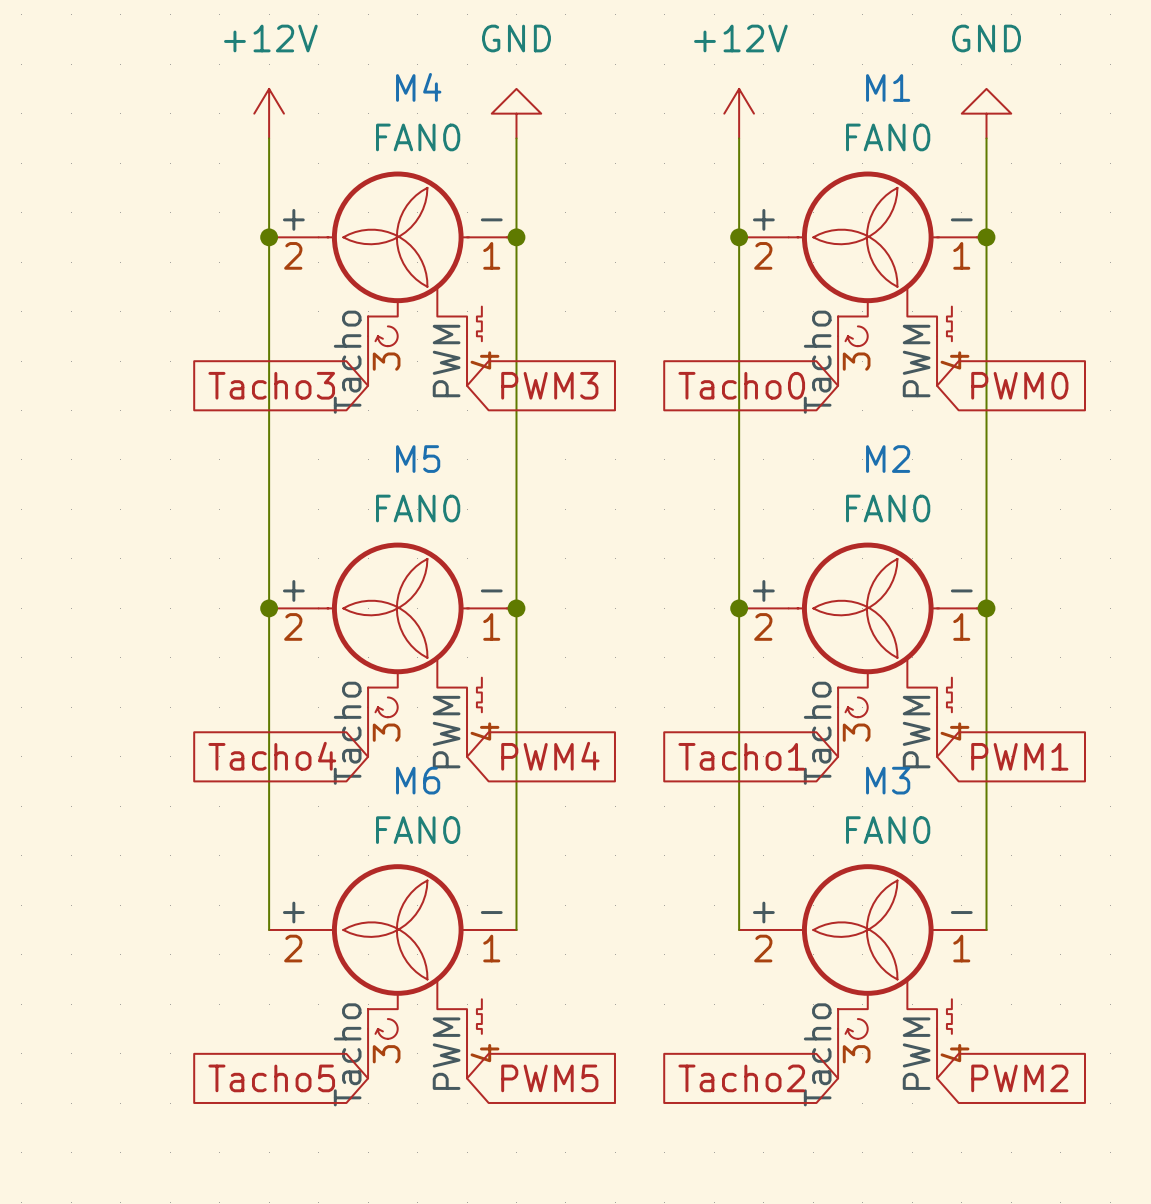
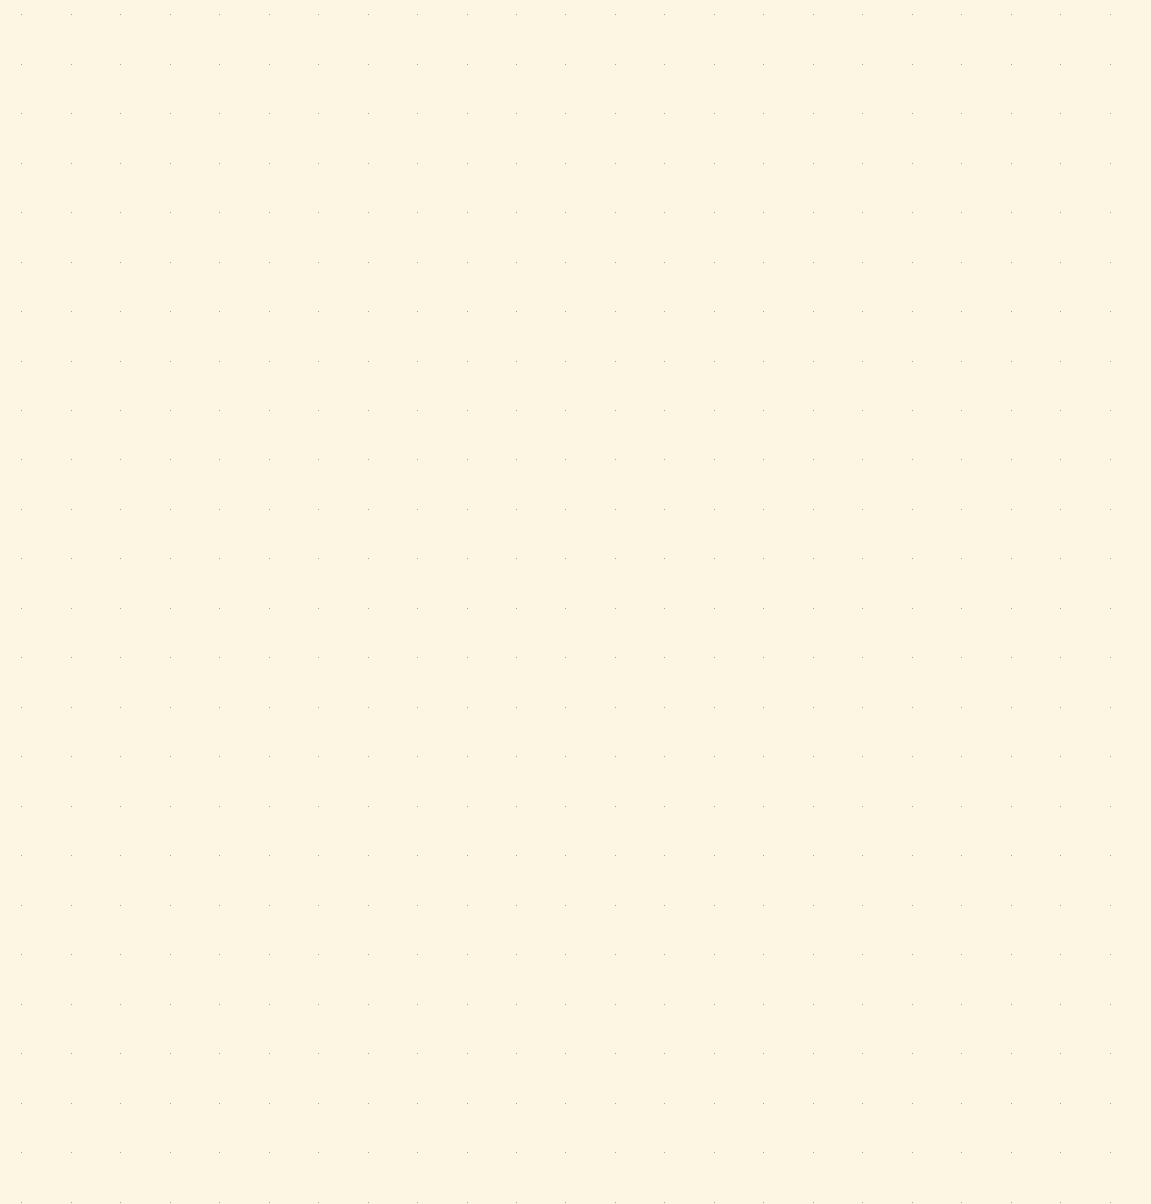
power symbol: +12V (269, 113) -> none
power symbol: GND (516, 113) -> none
power symbol: +12V (739, 113) -> none
power symbol: GND (986, 113) -> none
wire: (269, 138) (269, 929) -> none
wire: (516, 138) (516, 929) -> none
wire: (739, 138) (739, 929) -> none
wire: (986, 138) (986, 929) -> none
junction: (269, 237) -> none
junction: (516, 237) -> none
junction: (739, 237) -> none
junction: (986, 237) -> none
M4: FAN0 (392, 278) -> none
M1: FAN0 (862, 278) -> none
global label: Tacho3 (271, 385) -> none
global label: PWM3 (549, 385) -> none
global label: Tacho0 (741, 385) -> none
global label: PWM0 (1019, 385) -> none
junction: (269, 608) -> none
junction: (516, 608) -> none
junction: (739, 608) -> none
junction: (986, 608) -> none
M5: FAN0 (392, 649) -> none
M2: FAN0 (862, 649) -> none
global label: Tacho4 (272, 756) -> none
global label: PWM4 (550, 756) -> none
global label: Tacho1 (741, 756) -> none
global label: PWM1 (1019, 756) -> none
M6: FAN0 (392, 971) -> none
M3: FAN0 (862, 971) -> none
global label: Tacho5 (271, 1078) -> none
global label: PWM5 (549, 1078) -> none
global label: Tacho2 (741, 1078) -> none
global label: PWM2 (1019, 1078) -> none

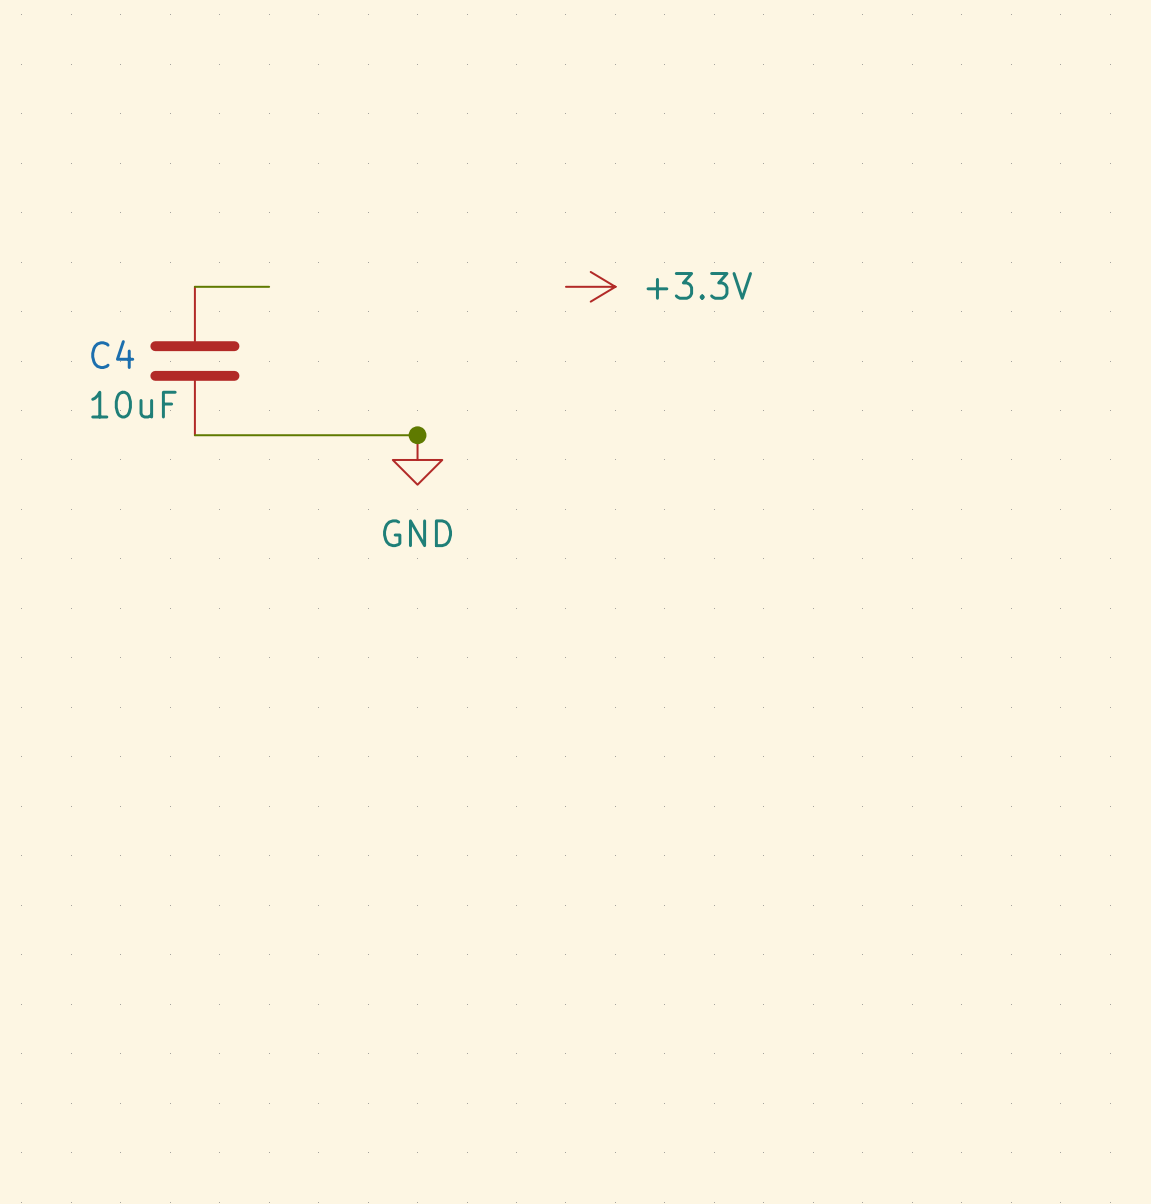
wire: none -> (194, 286) (269, 286)
power symbol: none -> +3.3V (590, 286)
C4: none -> 10uF (194, 361)
wire: none -> (194, 435) (417, 435)
junction: none -> (417, 435)
power symbol: none -> GND (417, 459)

